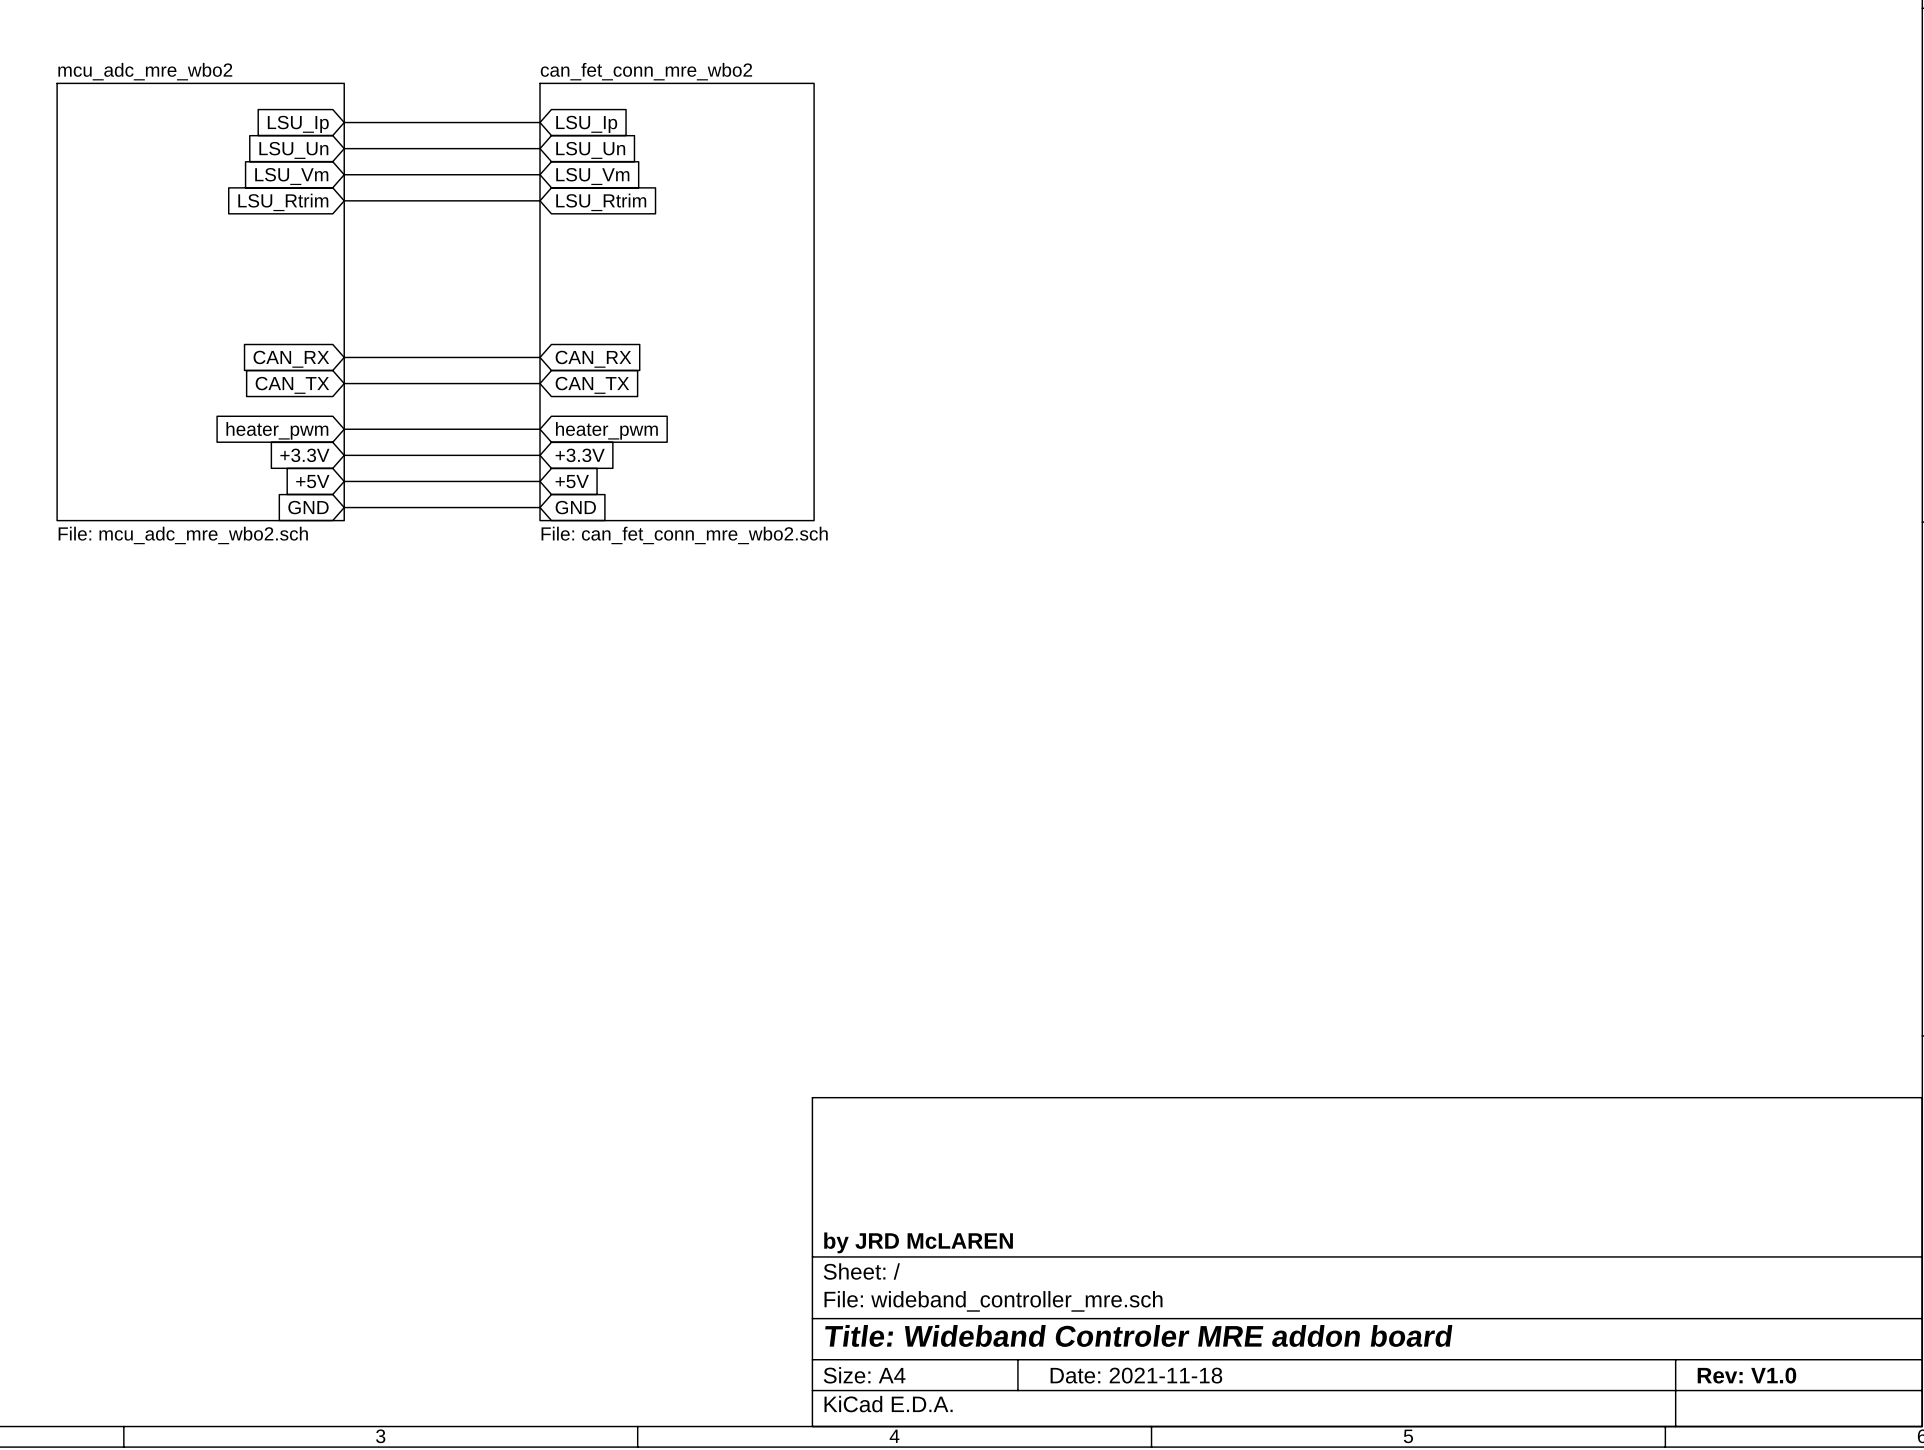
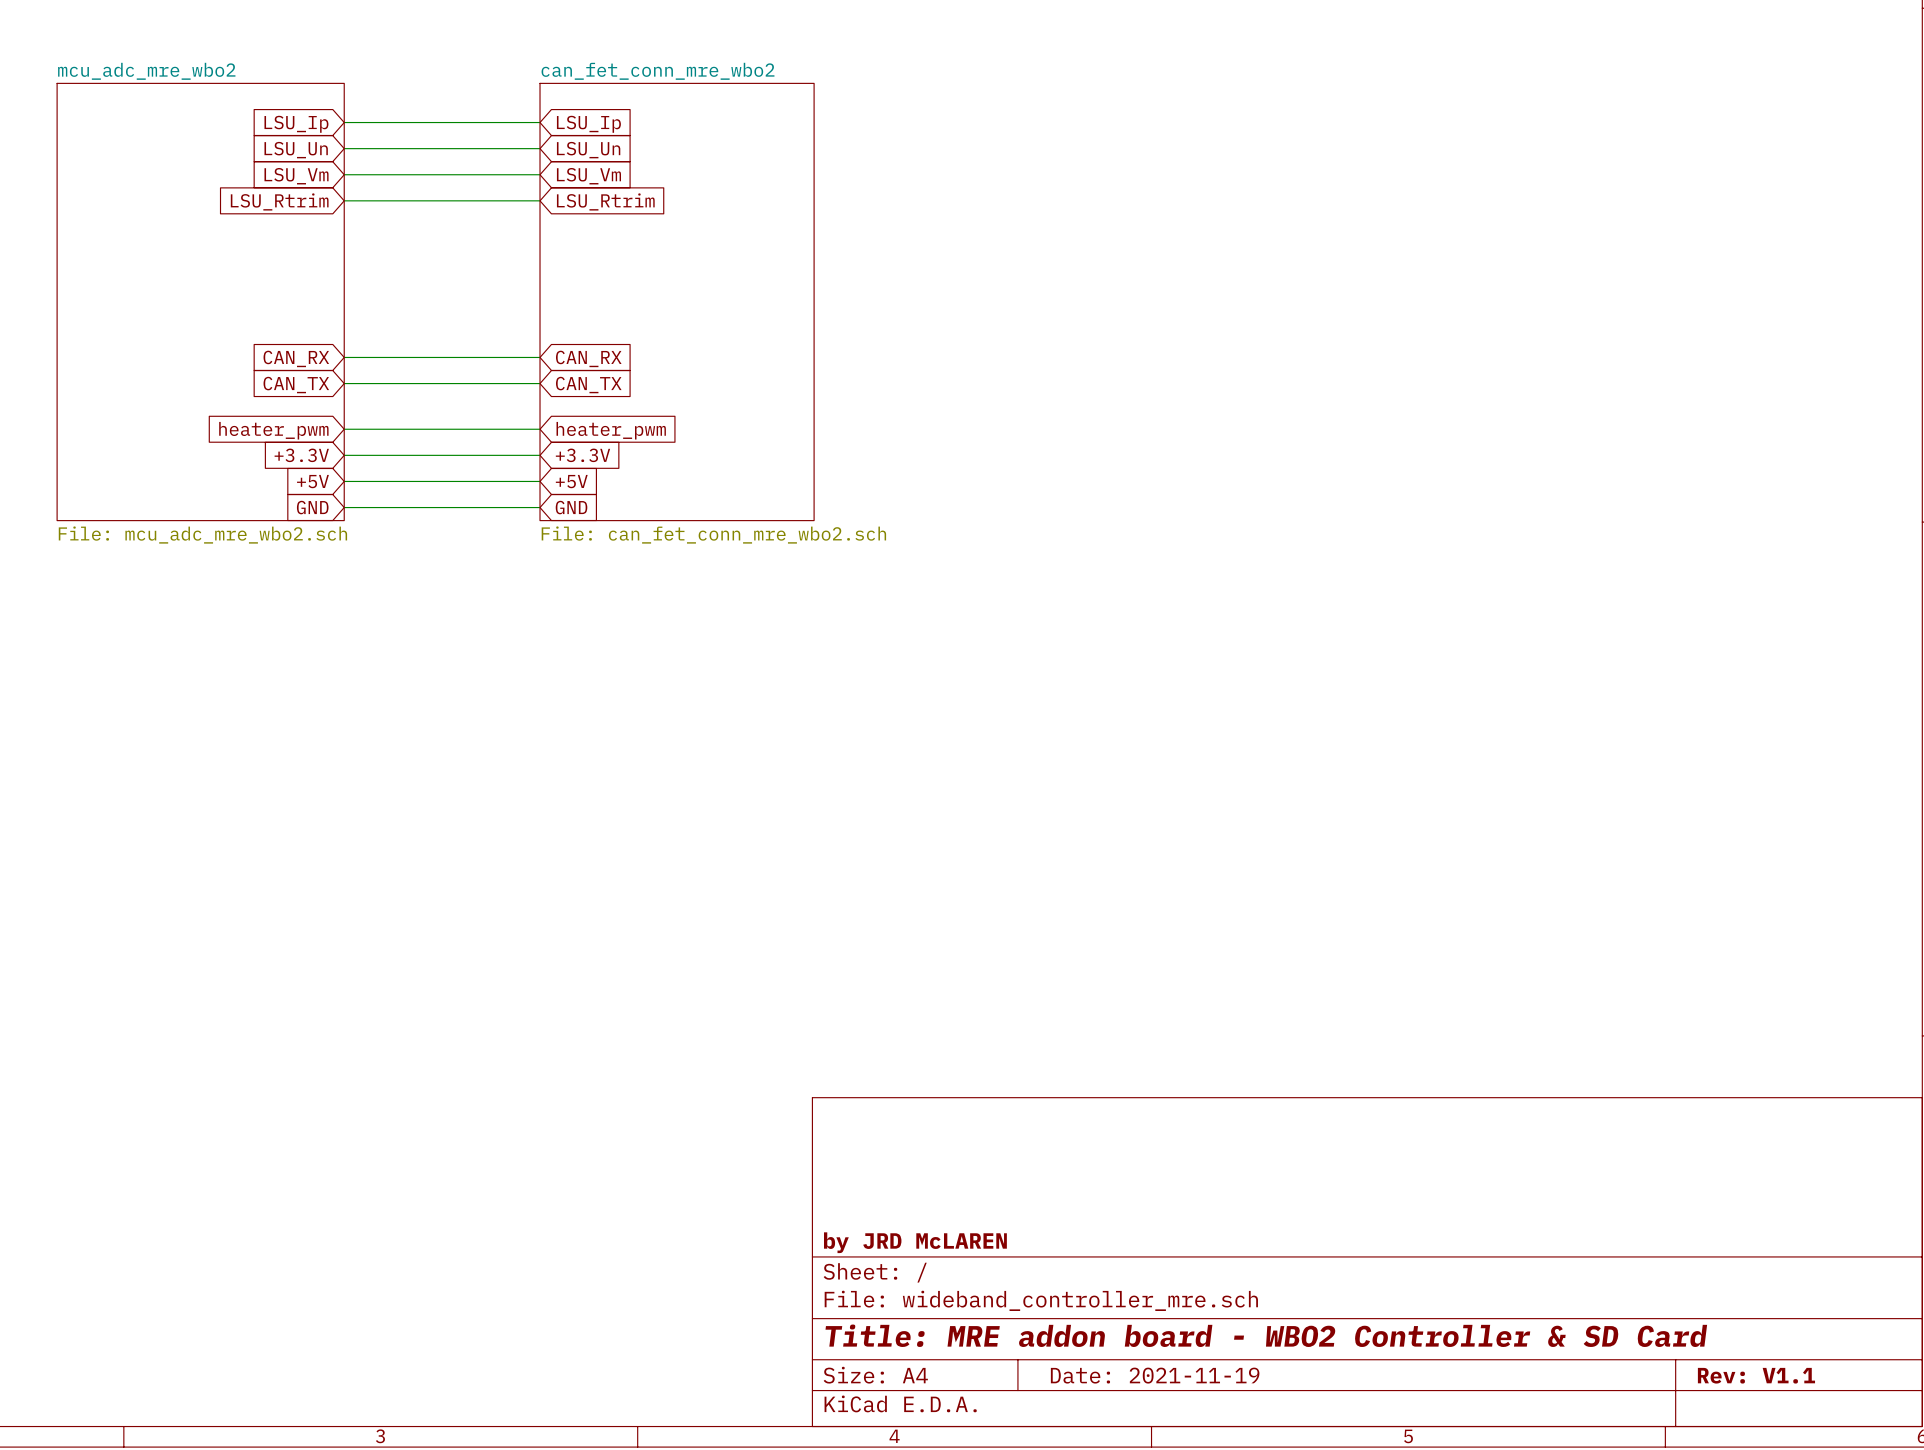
title block: Title: Wideband Controler MRE addon board (1138, 1335) -> Title: MRE addon board - WBO2 Controller & SD Card (1266, 1335)
title block: Date: 2021-11-18 (1136, 1375) -> Date: 2021-11-19 (1155, 1375)
title block: Rev: V1.0 (1746, 1375) -> Rev: V1.1 (1756, 1375)

